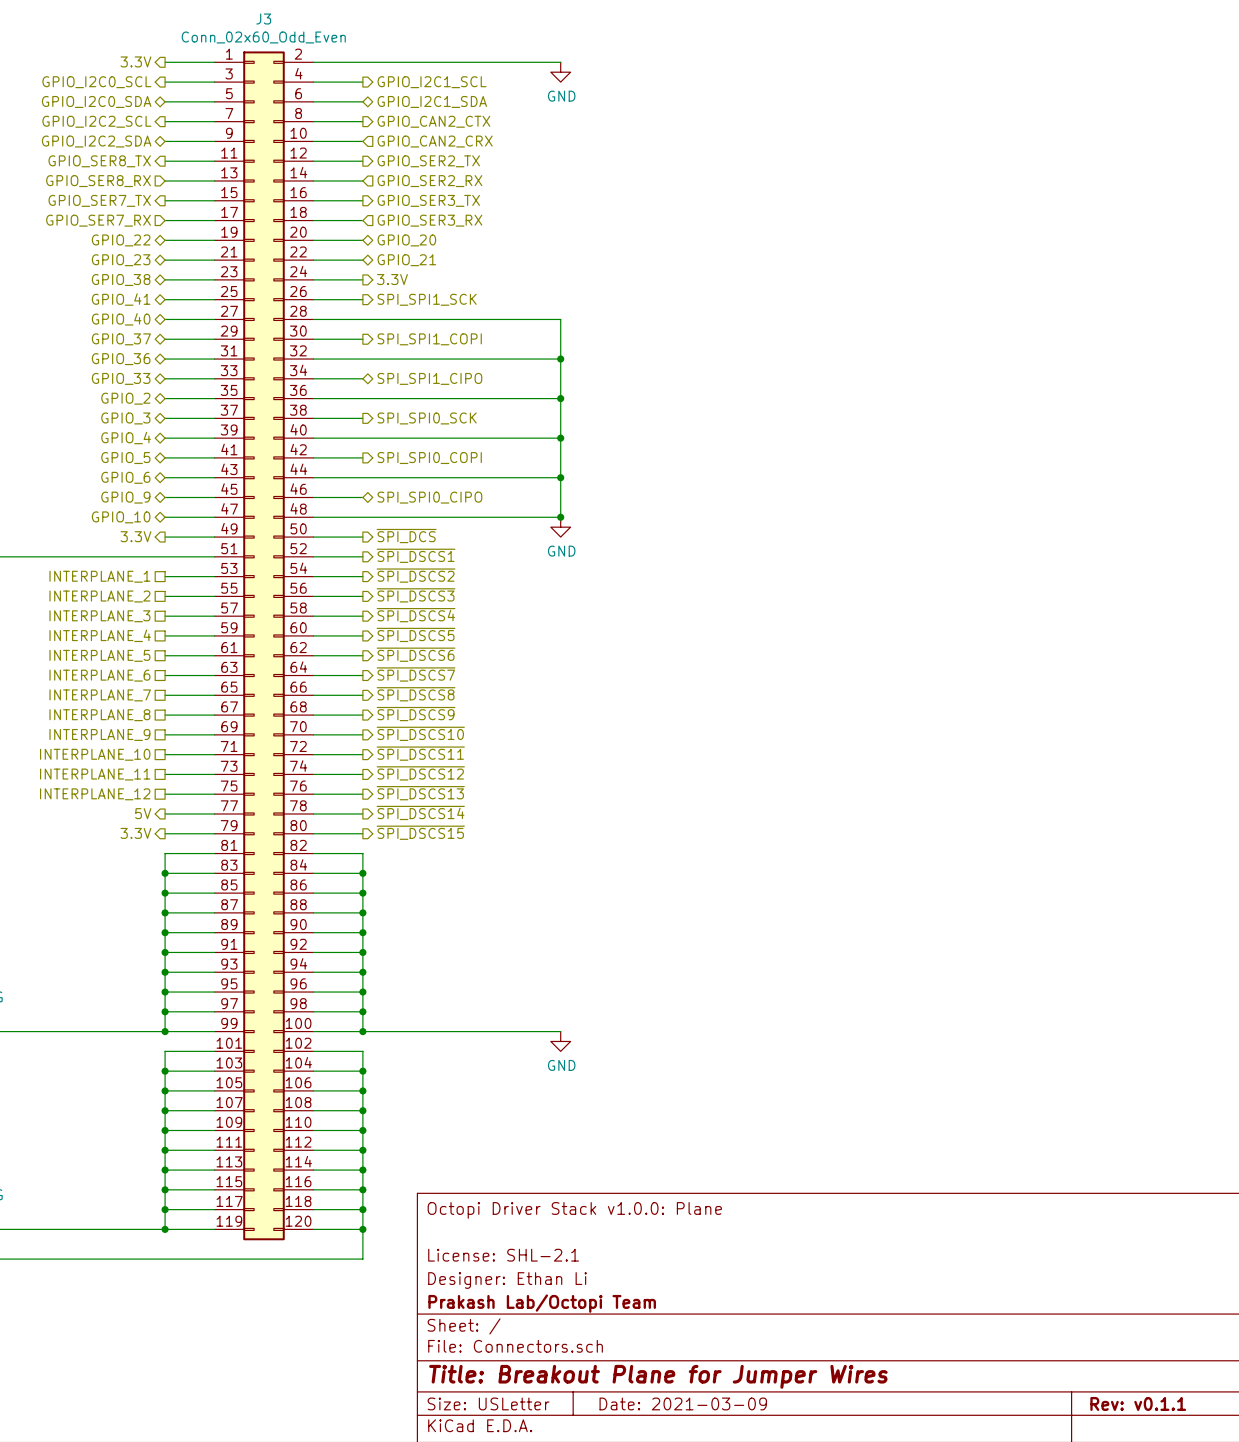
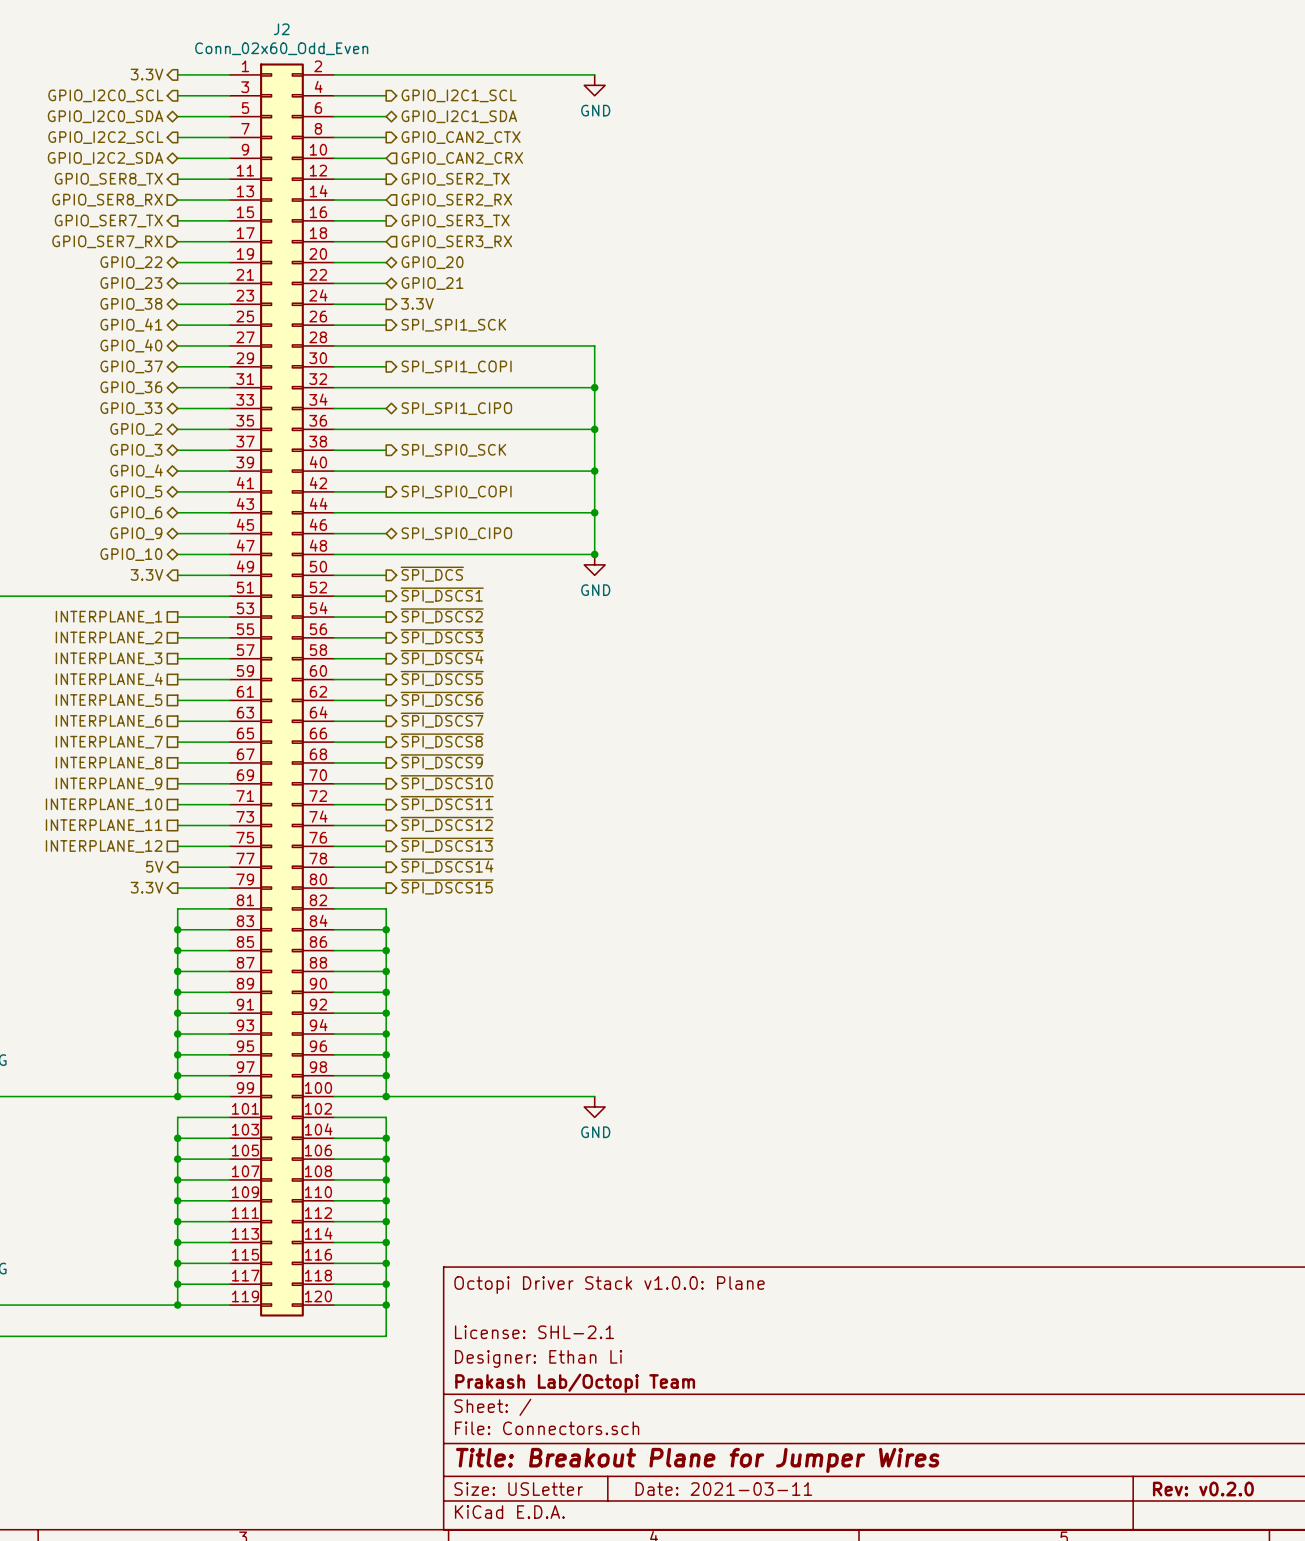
J3 name: J3 (263, 19) -> J2 (281, 29)
title block: Date: 2021-03-09 (683, 1403) -> Date: 2021-03-11 (723, 1489)
title block: Rev: v0.1.1 (1138, 1403) -> Rev: v0.2.0 (1203, 1489)

